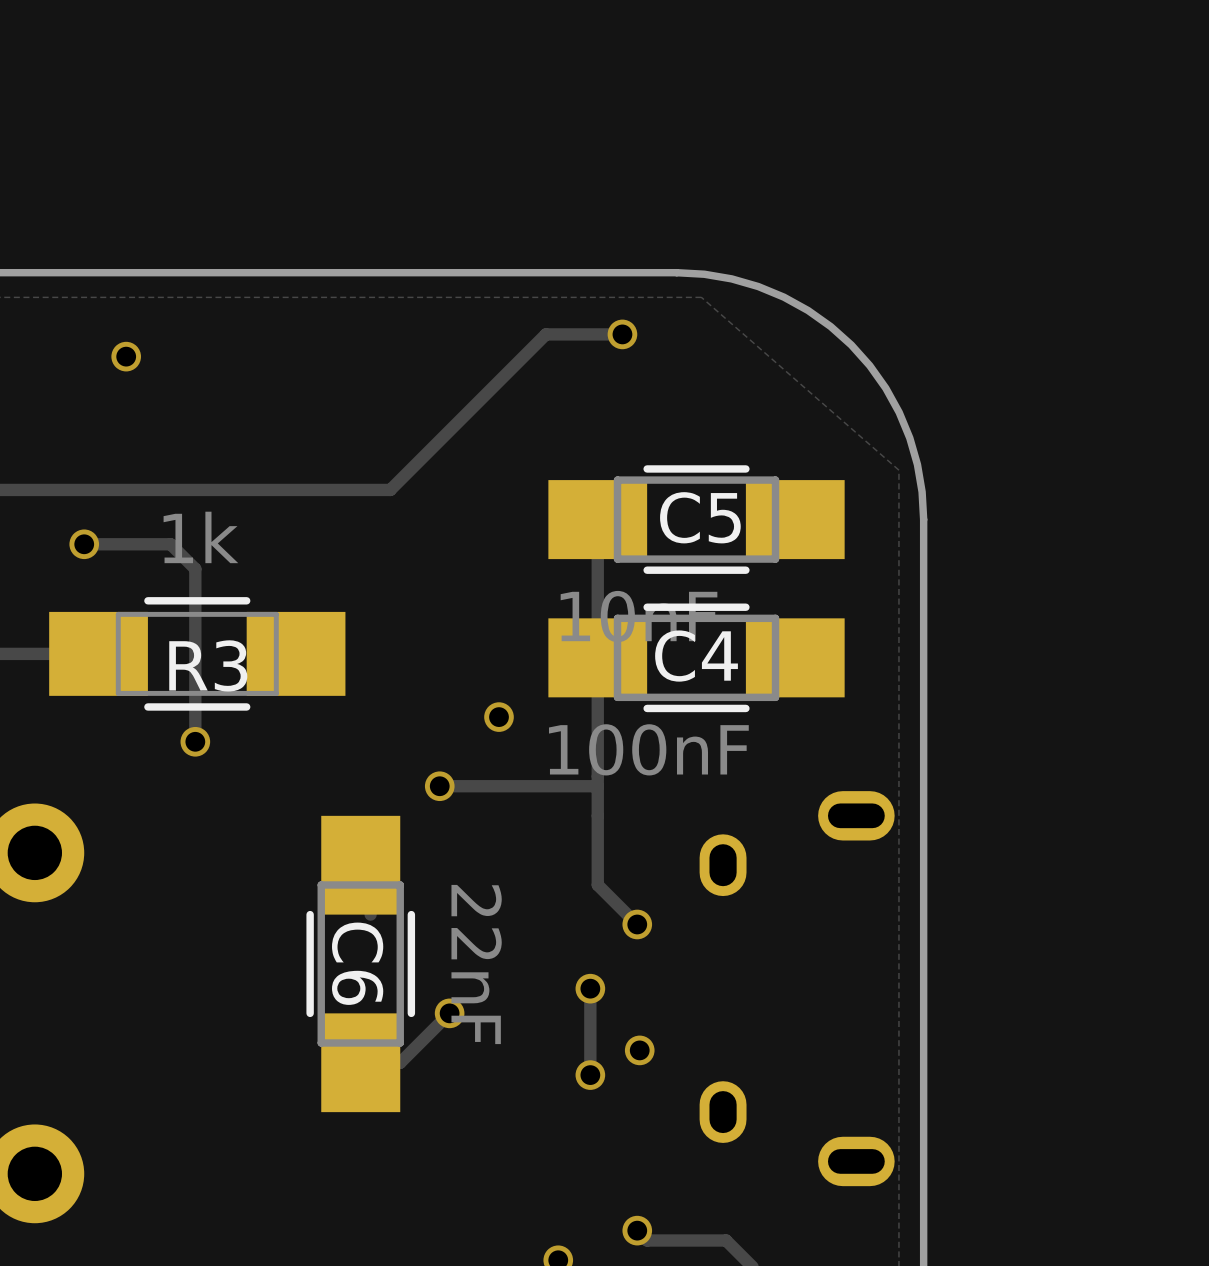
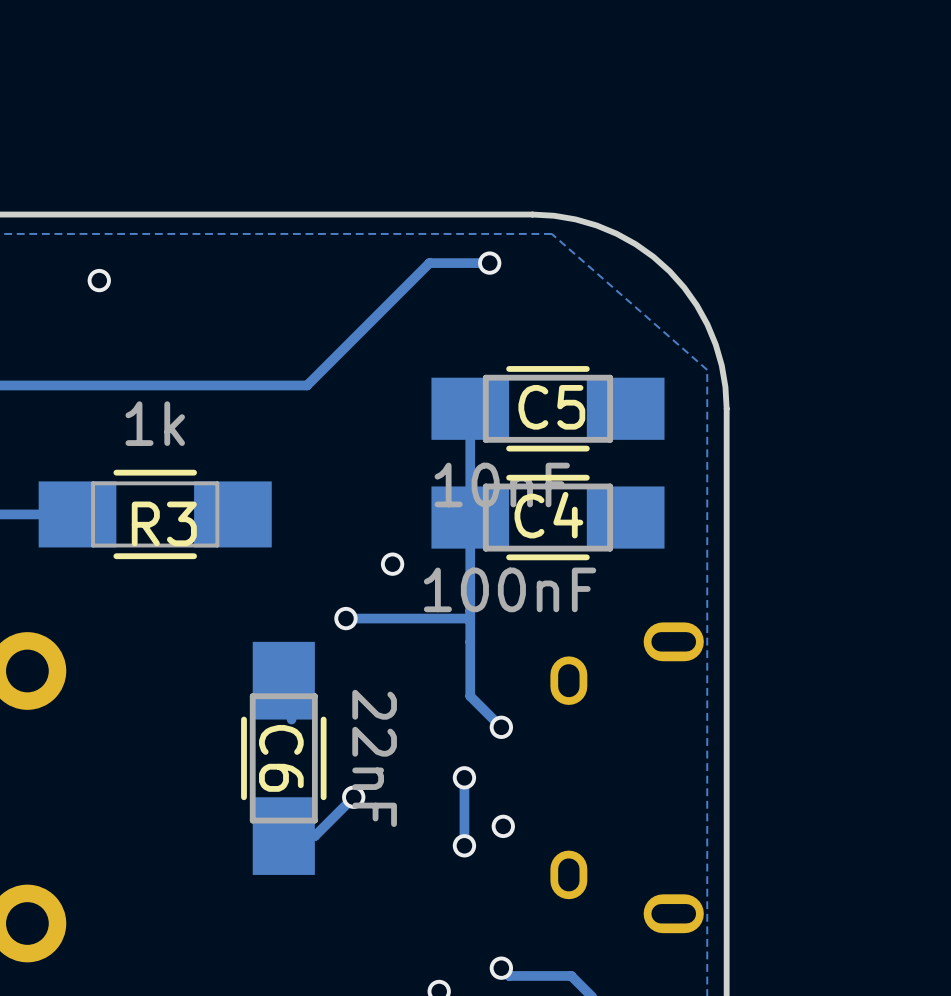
track: (84, 544) (170, 544) (195, 568) (195, 741) -> none
via: (84, 544) -> none
via: (195, 741) -> none

